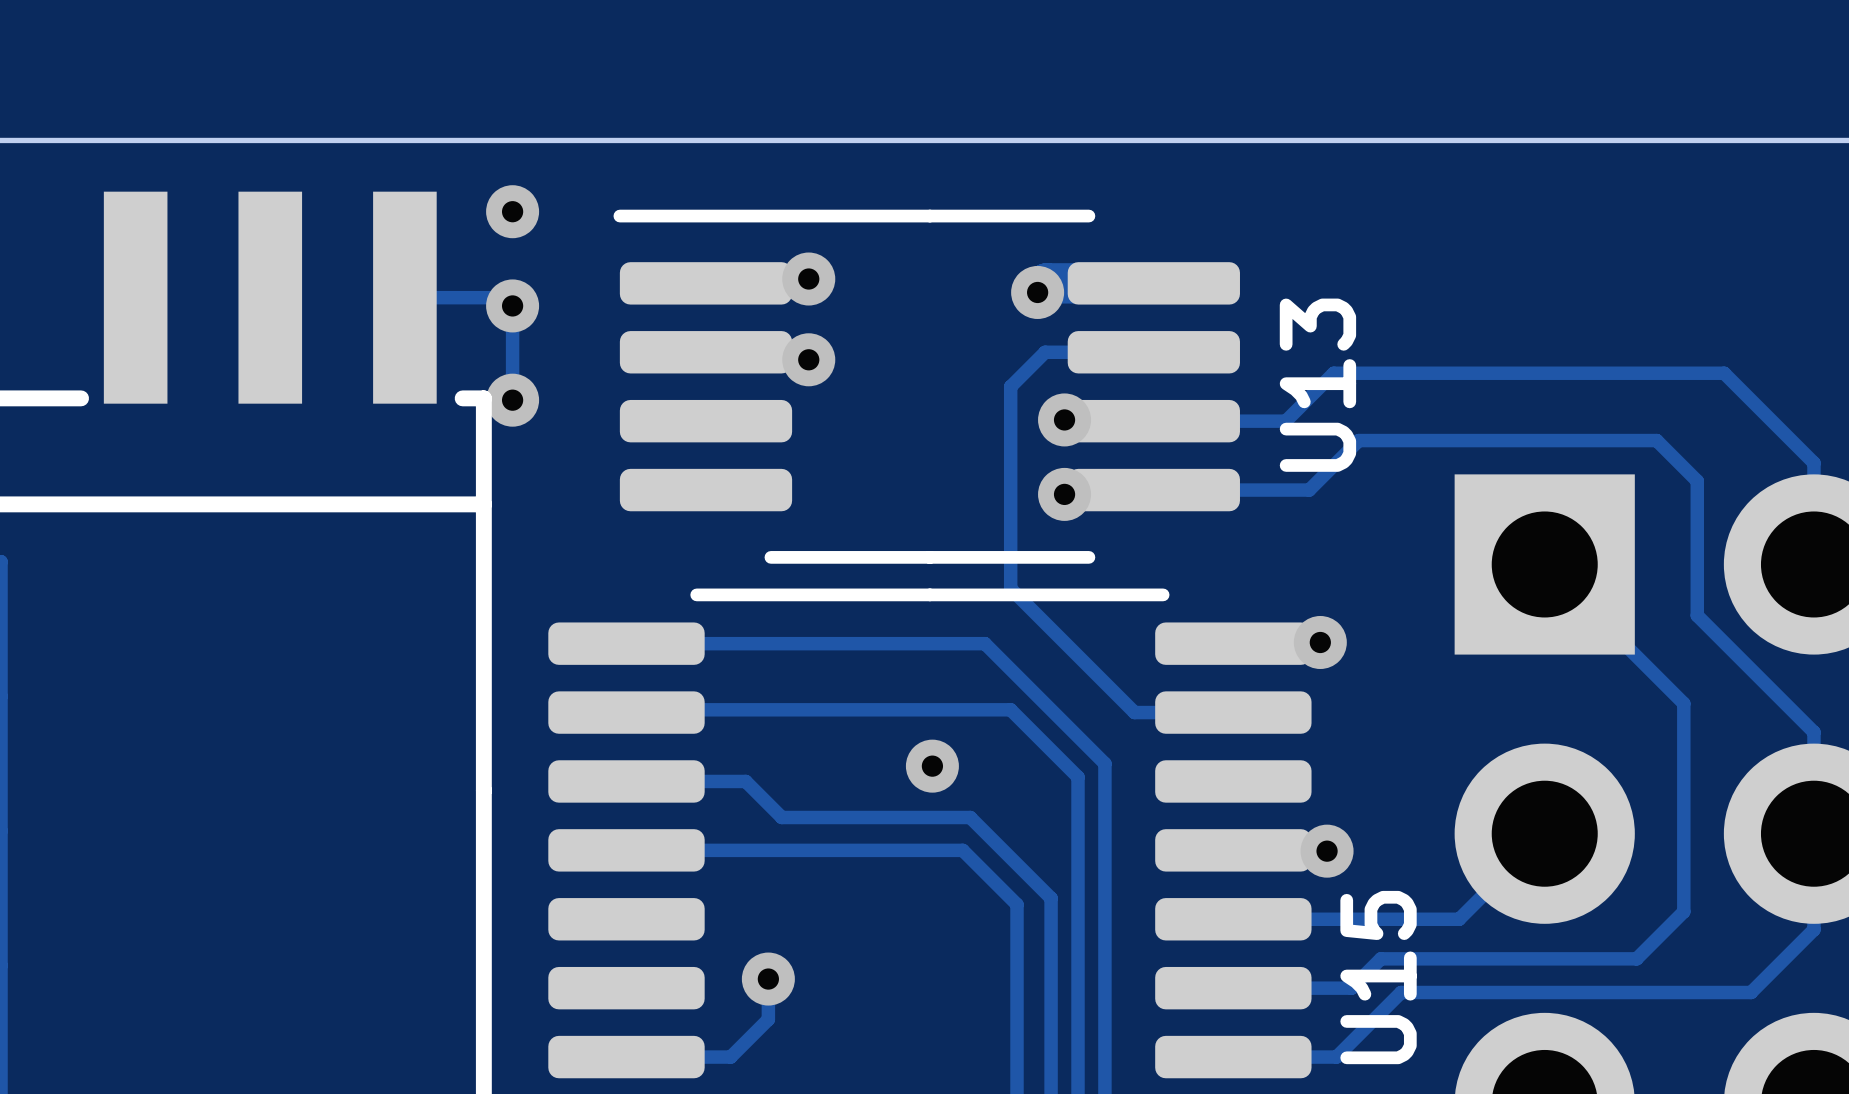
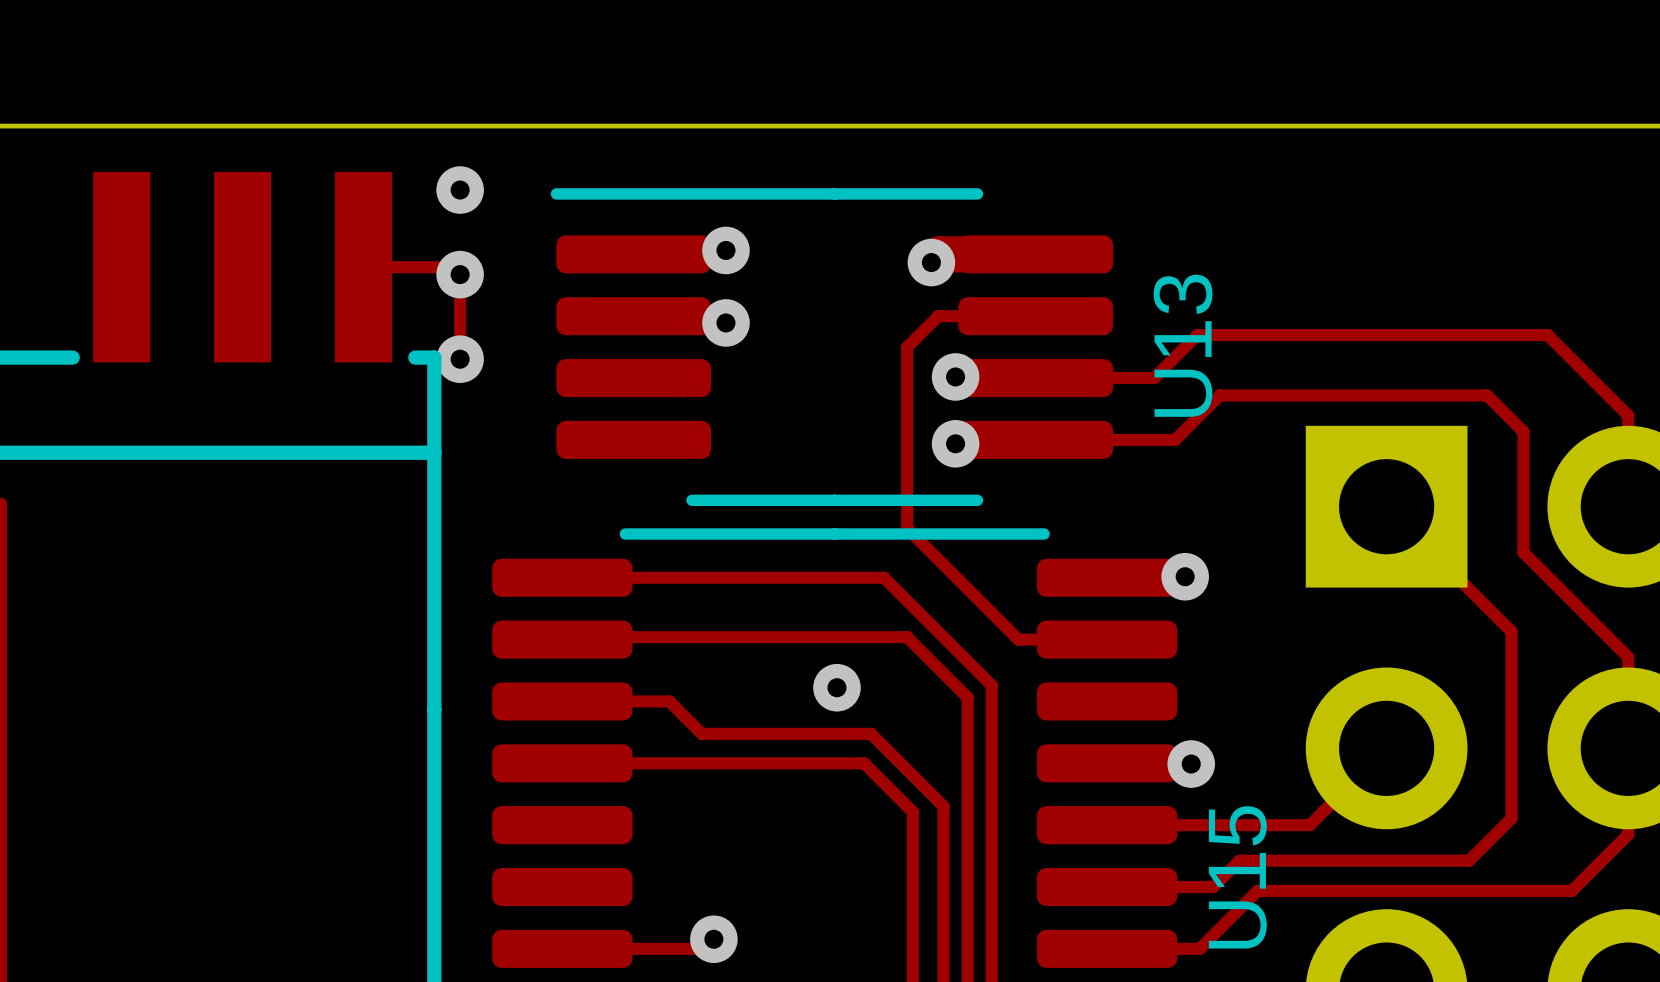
track: (768, 979) (768, 1019) (730, 1057) -> (713, 939) (704, 948) (655, 948)
via: (768, 979) -> none
via: none -> (713, 939)

